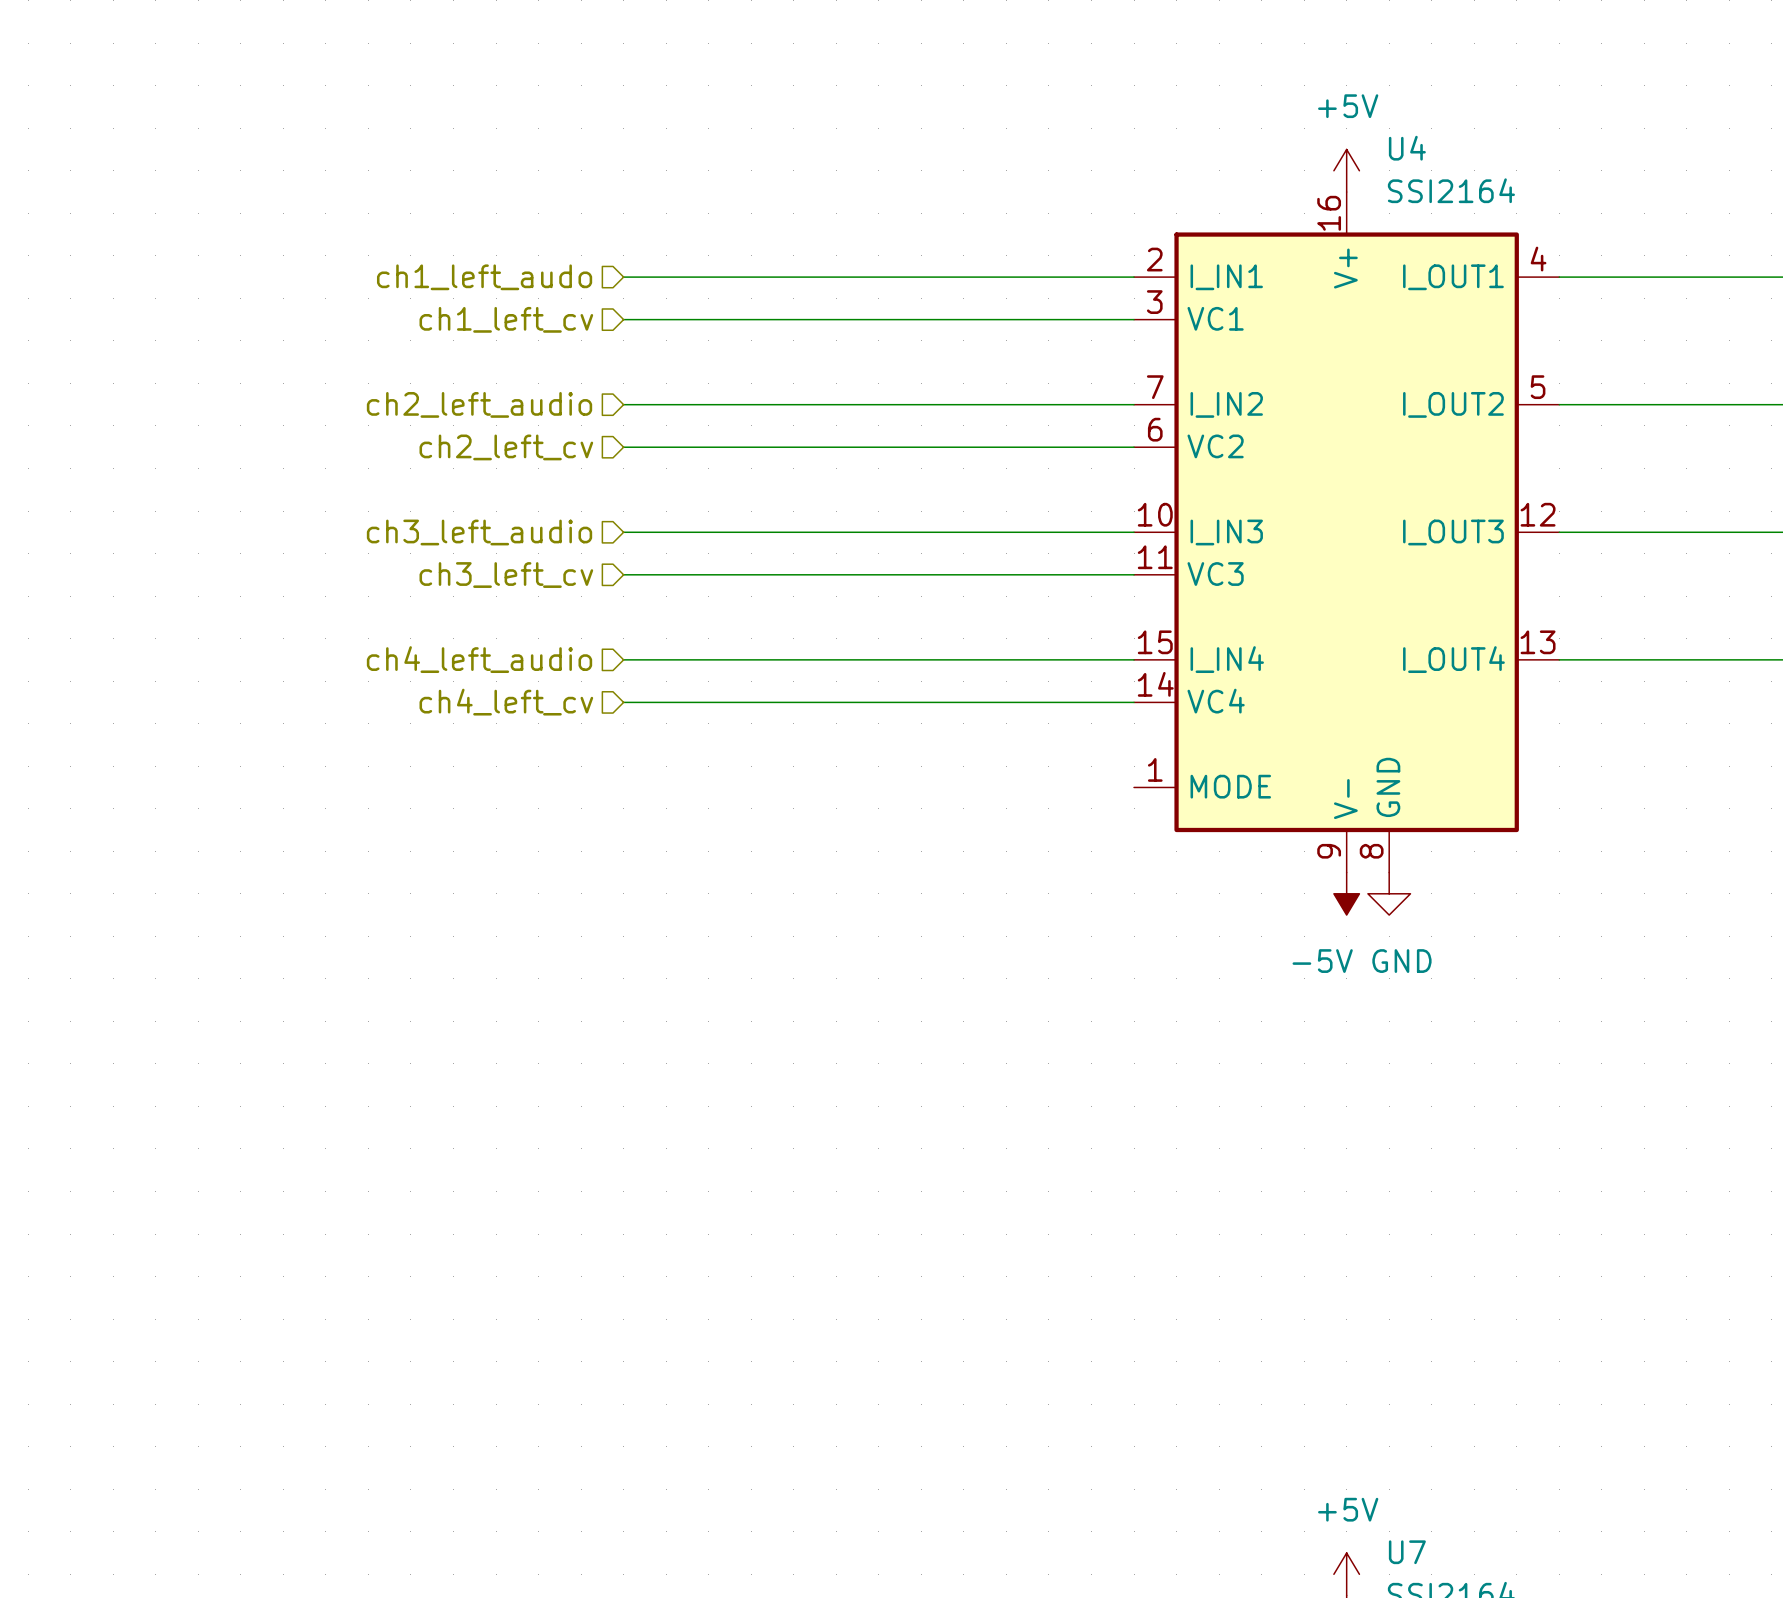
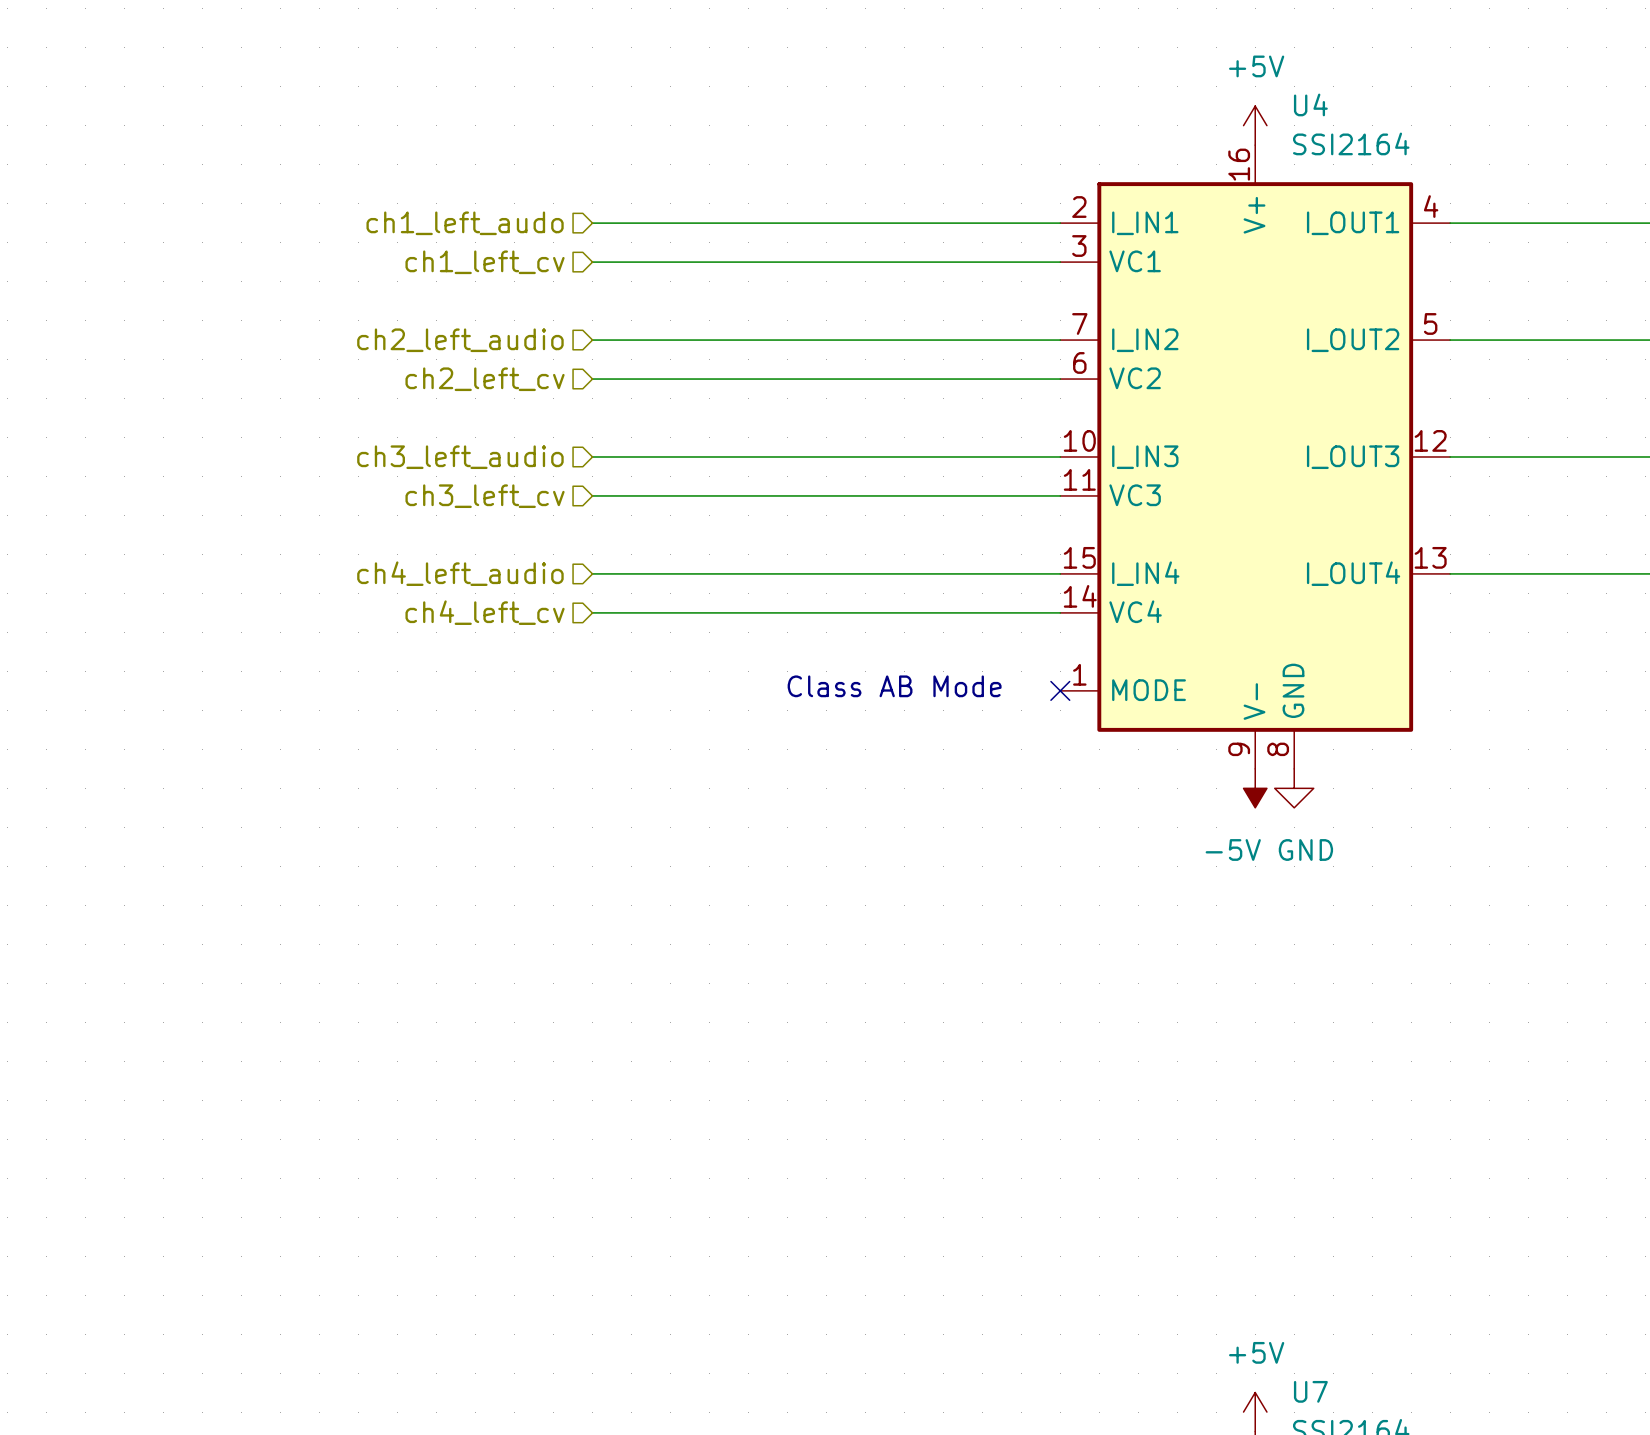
text: none -> Class AB Mode (894, 686)
no-connect mark: none -> (1060, 690)

